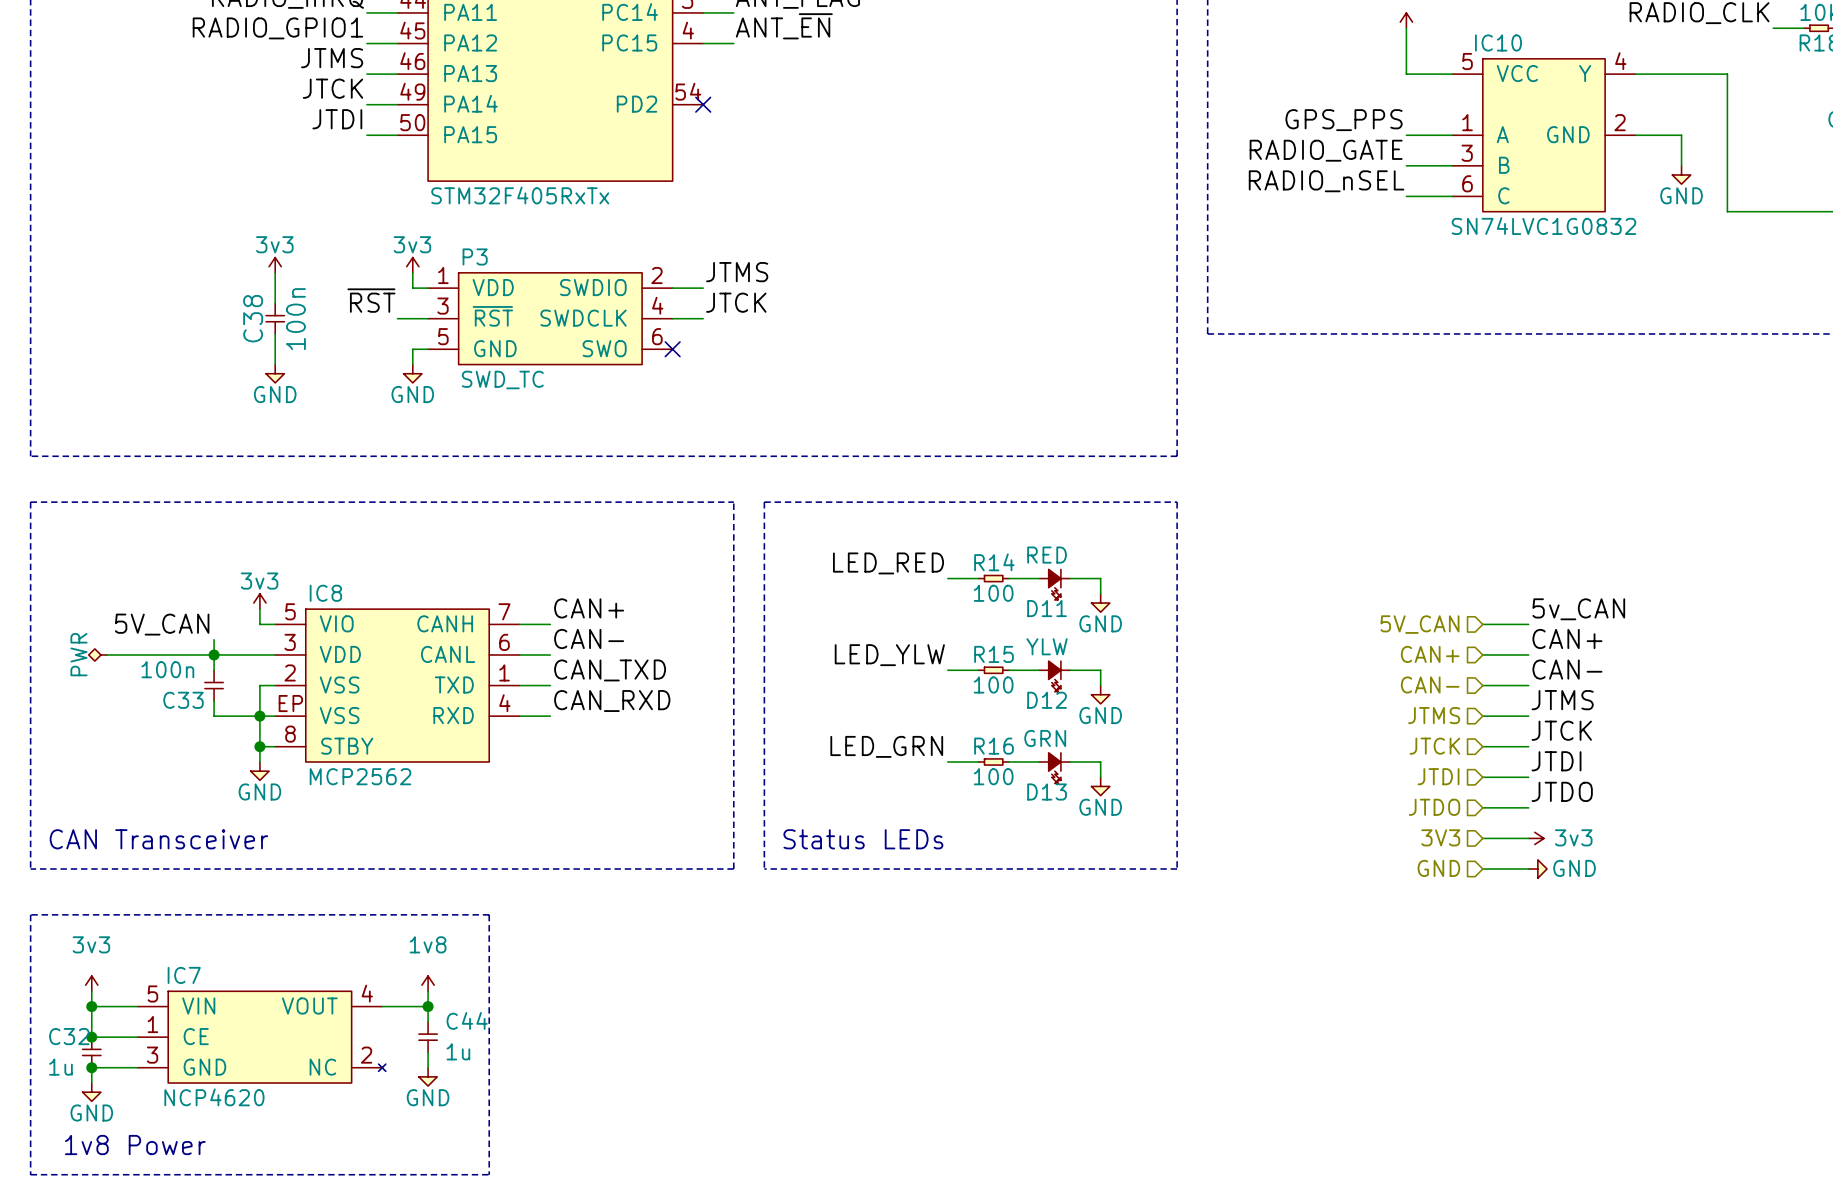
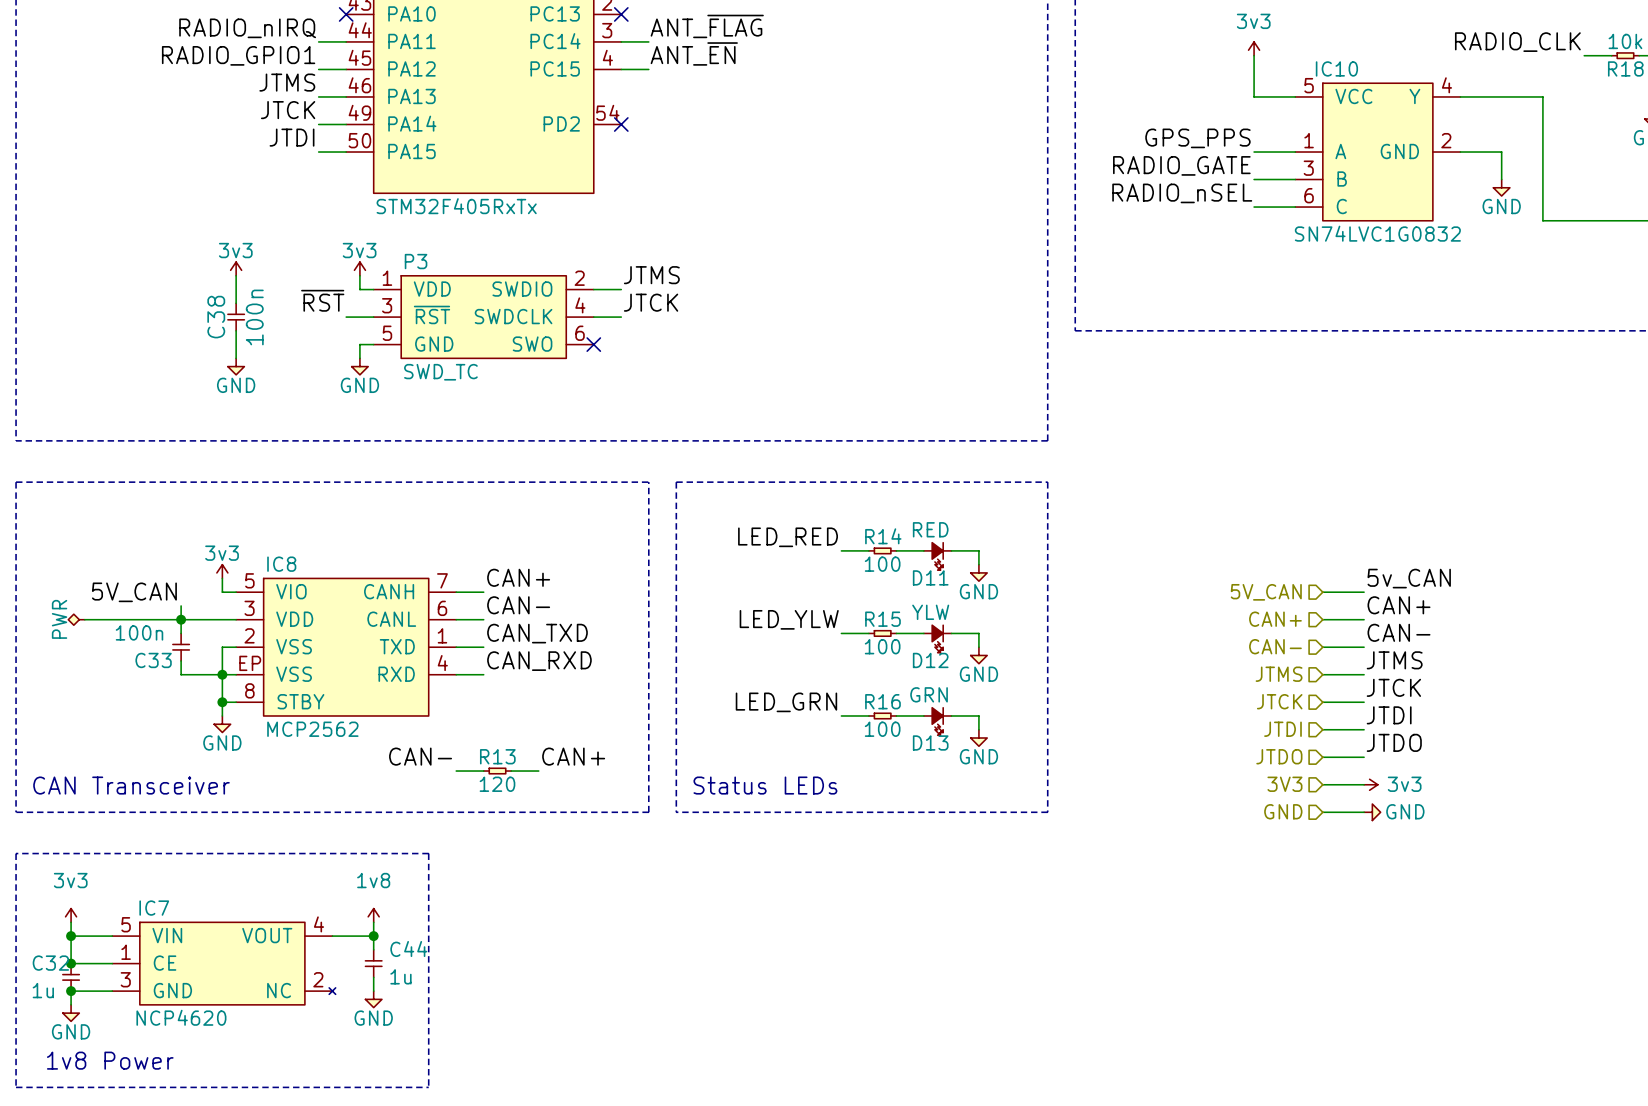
label: none -> CAN- (420, 756)
label: none -> CAN+ (573, 756)
wire: none -> (456, 771) (483, 771)
R13: none -> 120 (497, 771)
wire: none -> (511, 771) (538, 771)

